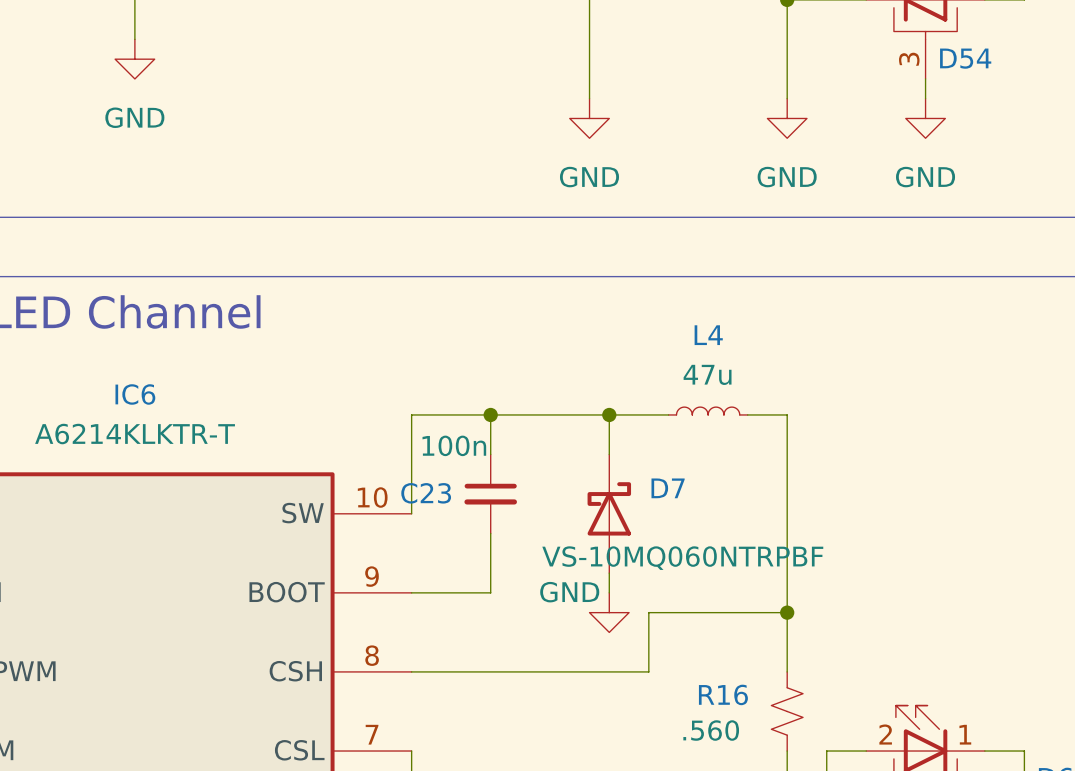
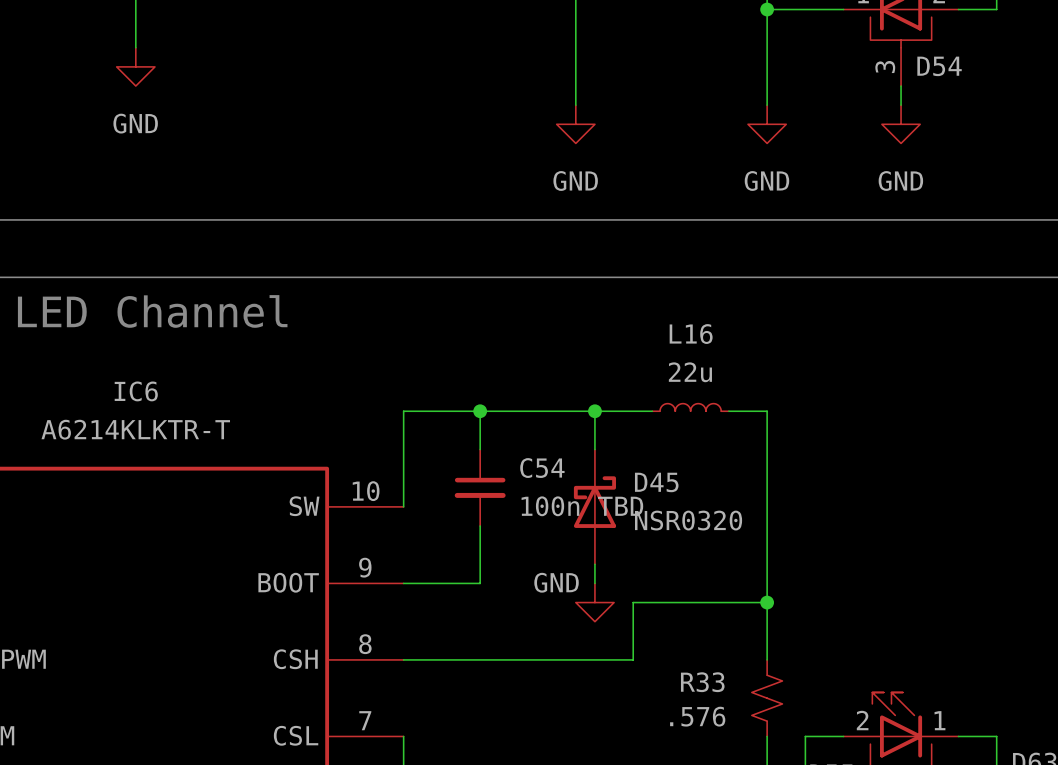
L4 name: L4 (708, 335) -> L16 (691, 334)
L4 value: 47u (707, 374) -> 22u (690, 372)
C23 value: 100n (454, 445) -> 100n TBD (582, 506)
D7 name: D7 (668, 488) -> D45 (656, 482)
C23 name: C23 (426, 493) -> C54 (542, 468)
D7 value: VS-10MQ060NTRPBF (682, 558) -> NSR0320 (688, 520)
R16 name: R16 (723, 694) -> R33 (702, 682)
R16 value: .560 (711, 730) -> .576 (697, 716)

